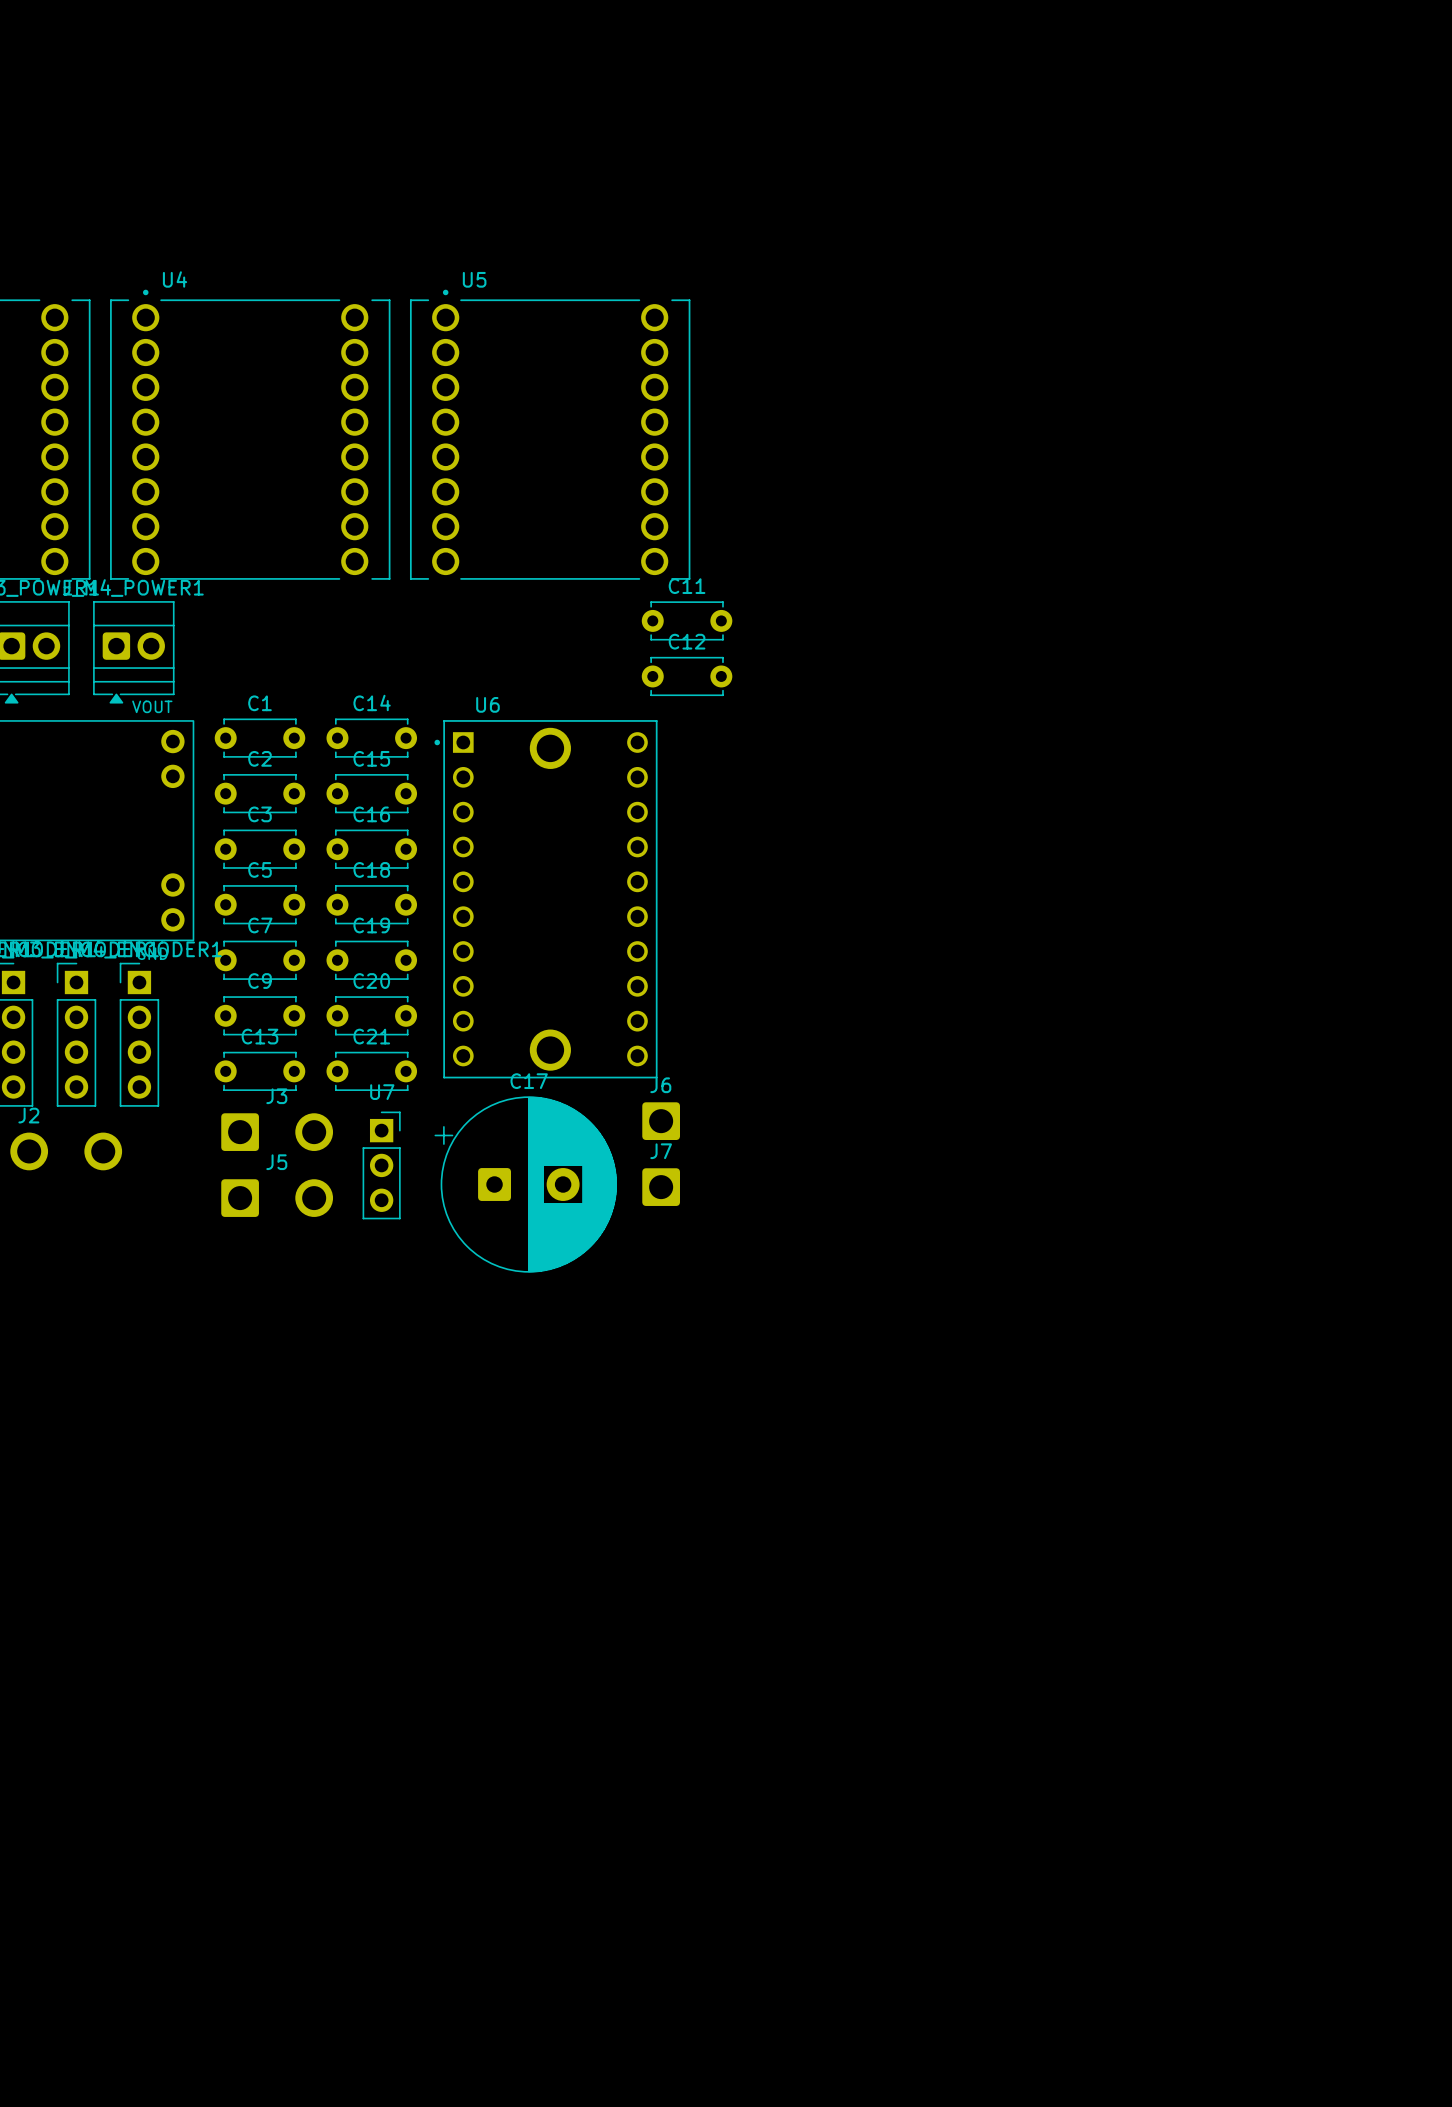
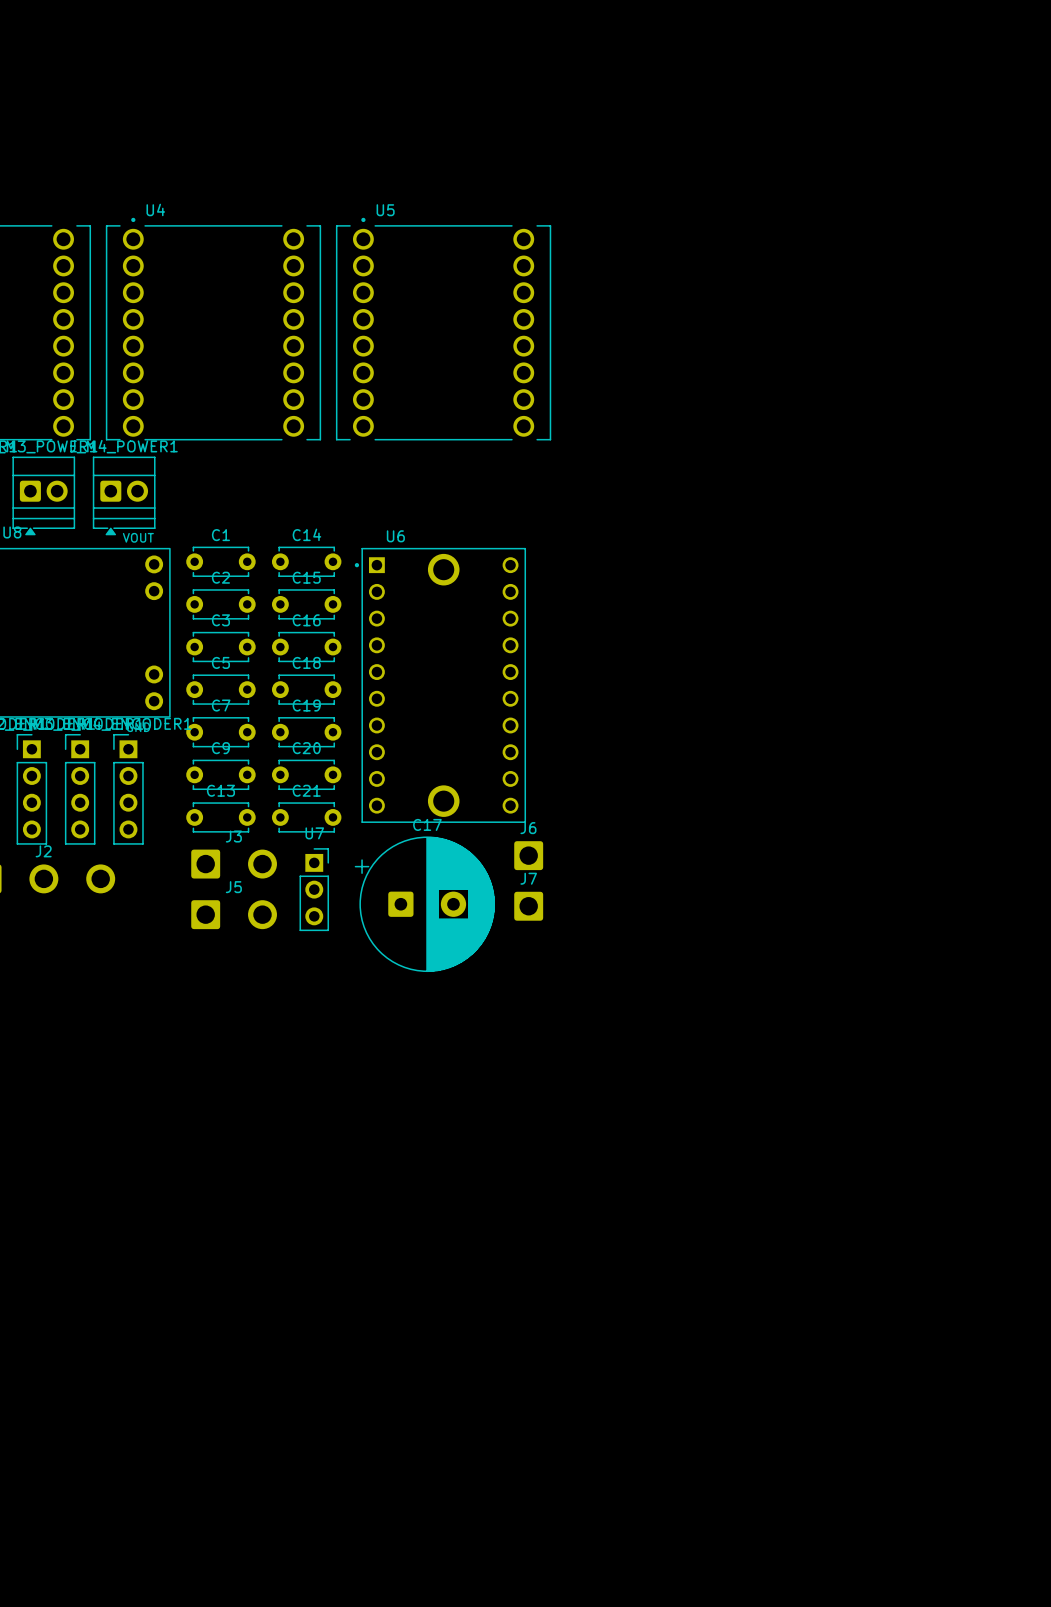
C11: (687, 620) -> none
C12: (687, 676) -> none

